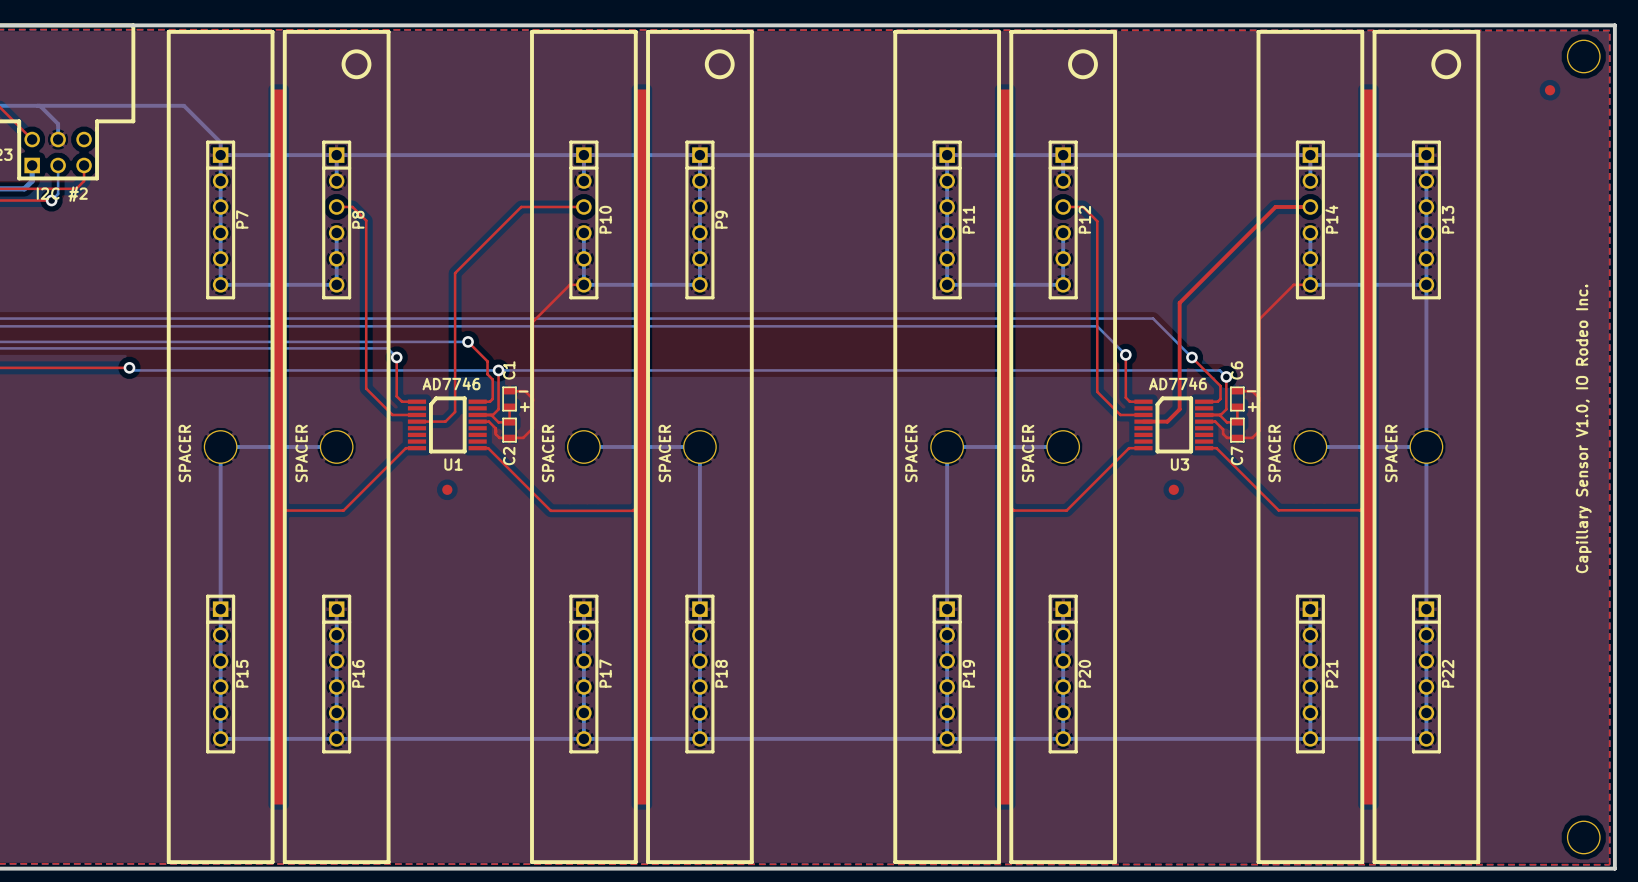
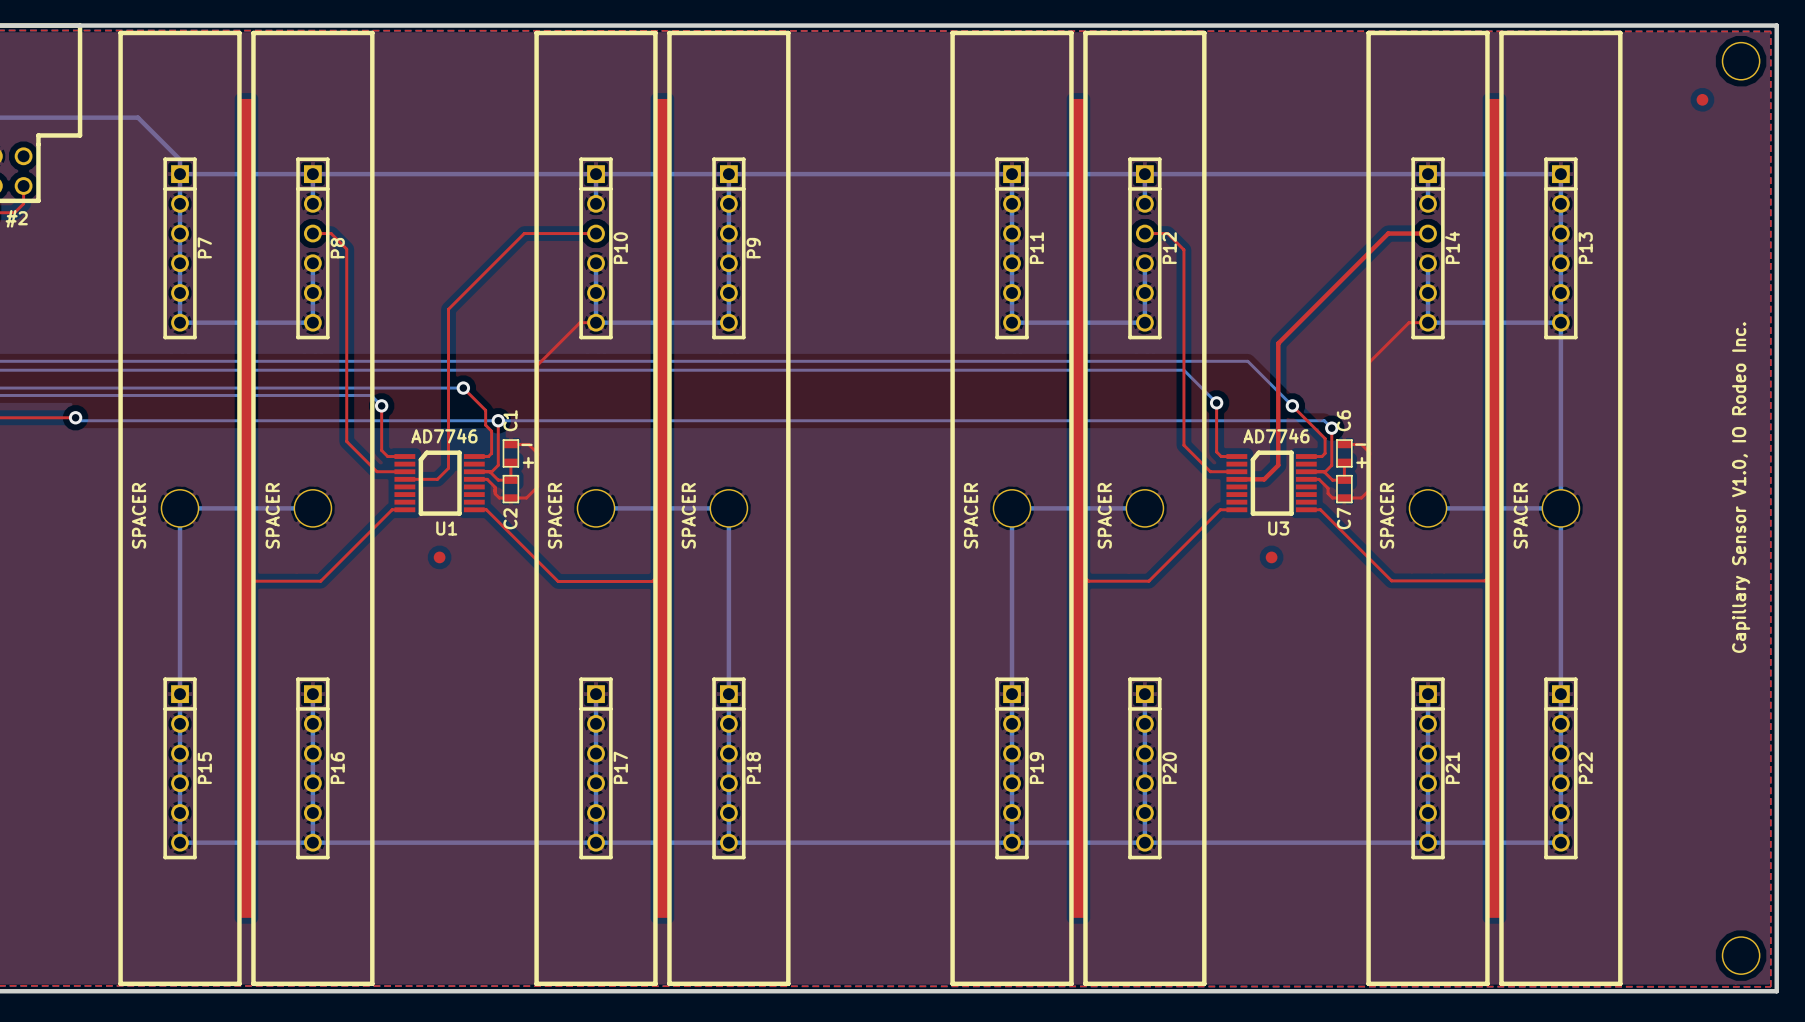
drawing: [341, 49, 372, 80] -> none
drawing: [704, 49, 735, 80] -> none
drawing: [1068, 49, 1098, 80] -> none
drawing: [1431, 49, 1462, 80] -> none

